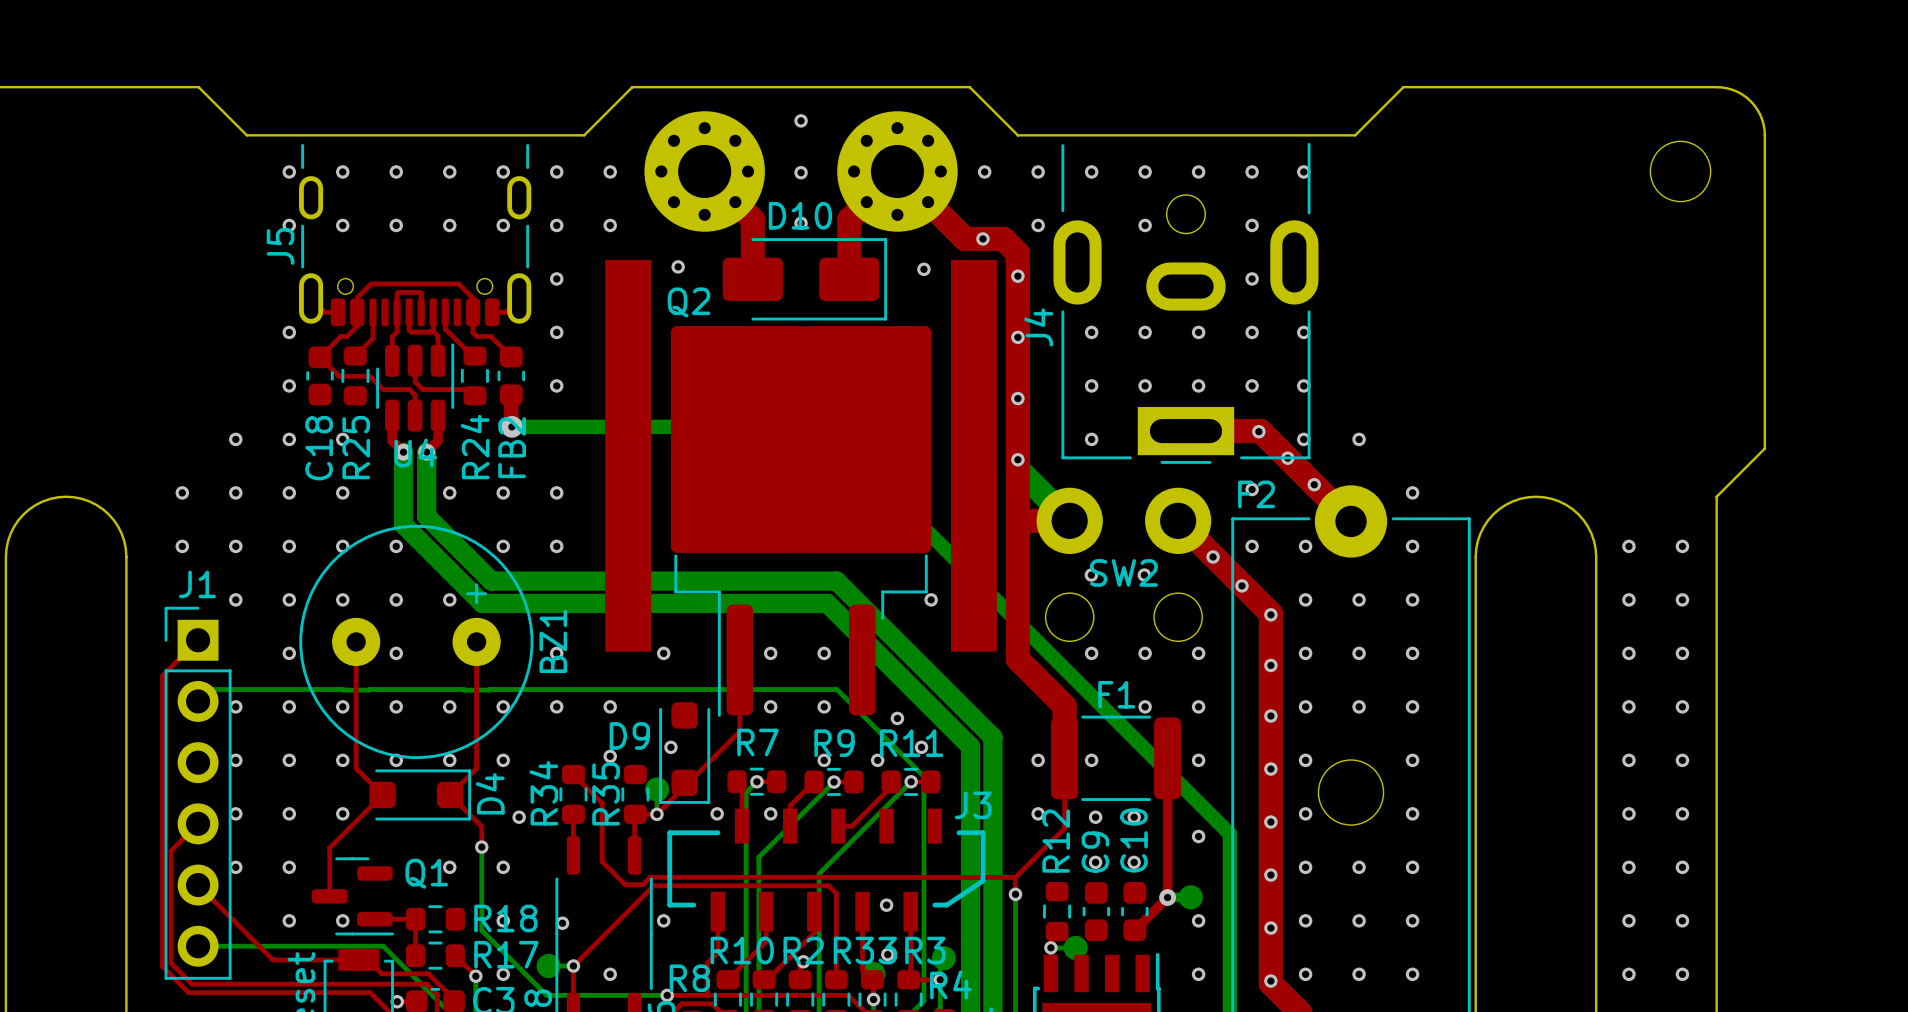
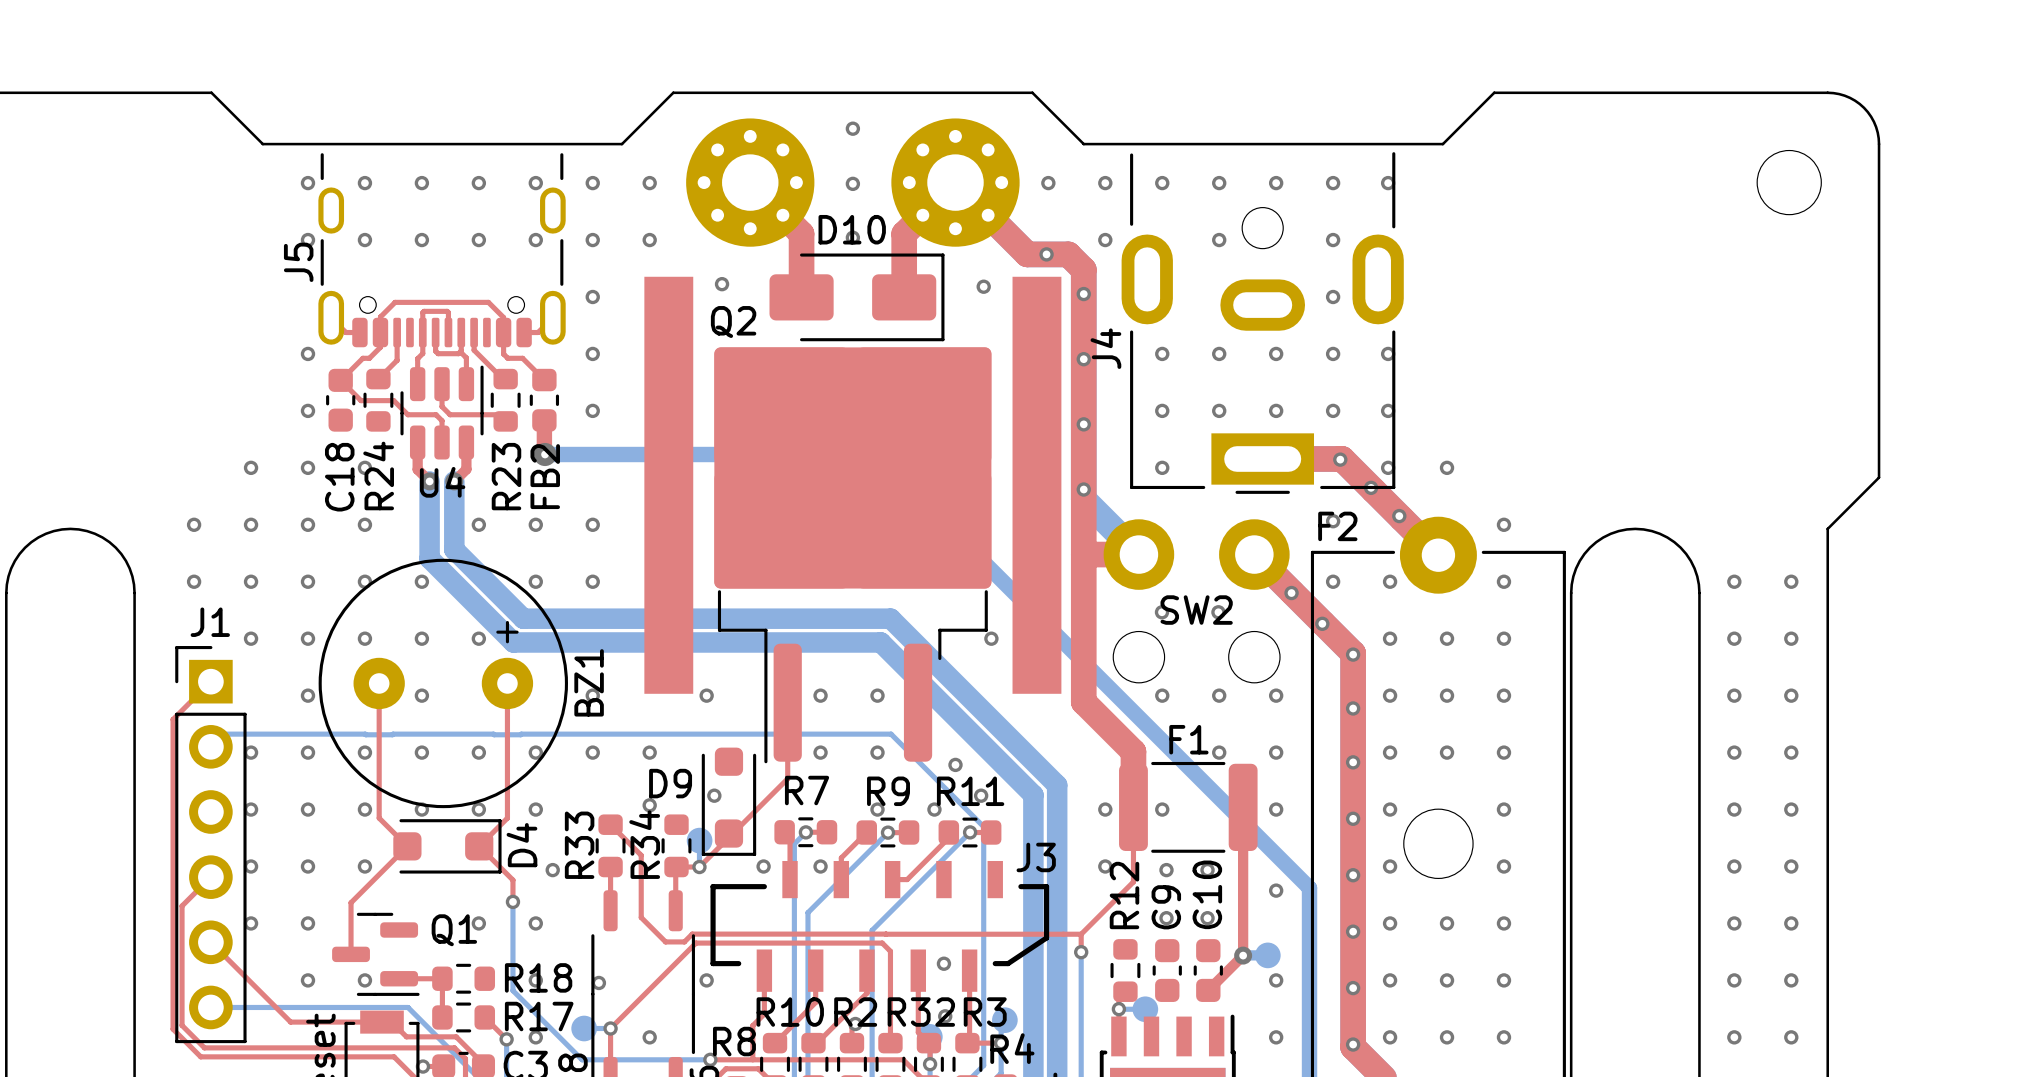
R25 name: R25 (356, 447) -> R24 (378, 475)
R24 name: R24 (475, 447) -> R23 (506, 476)
R34 name: R34 (543, 793) -> R33 (579, 845)
R35 name: R35 (606, 793) -> R34 (644, 844)
R33 name: R33 (865, 950) -> R32 (921, 1012)

